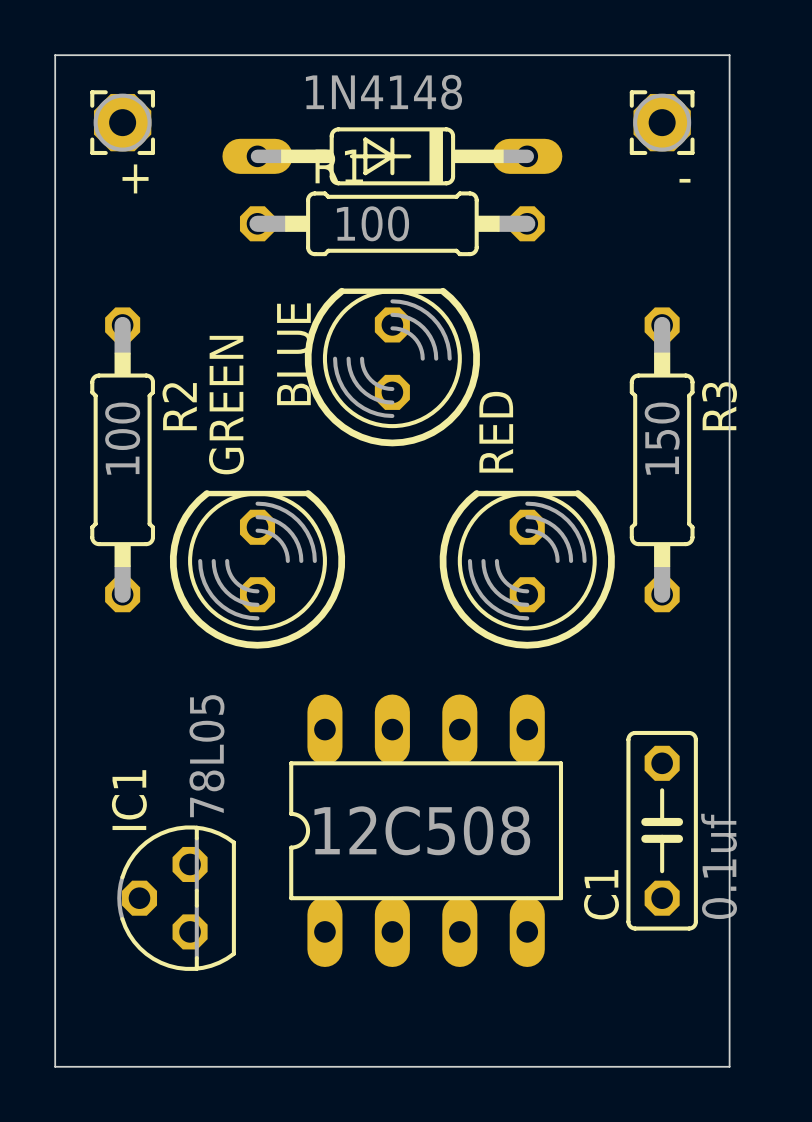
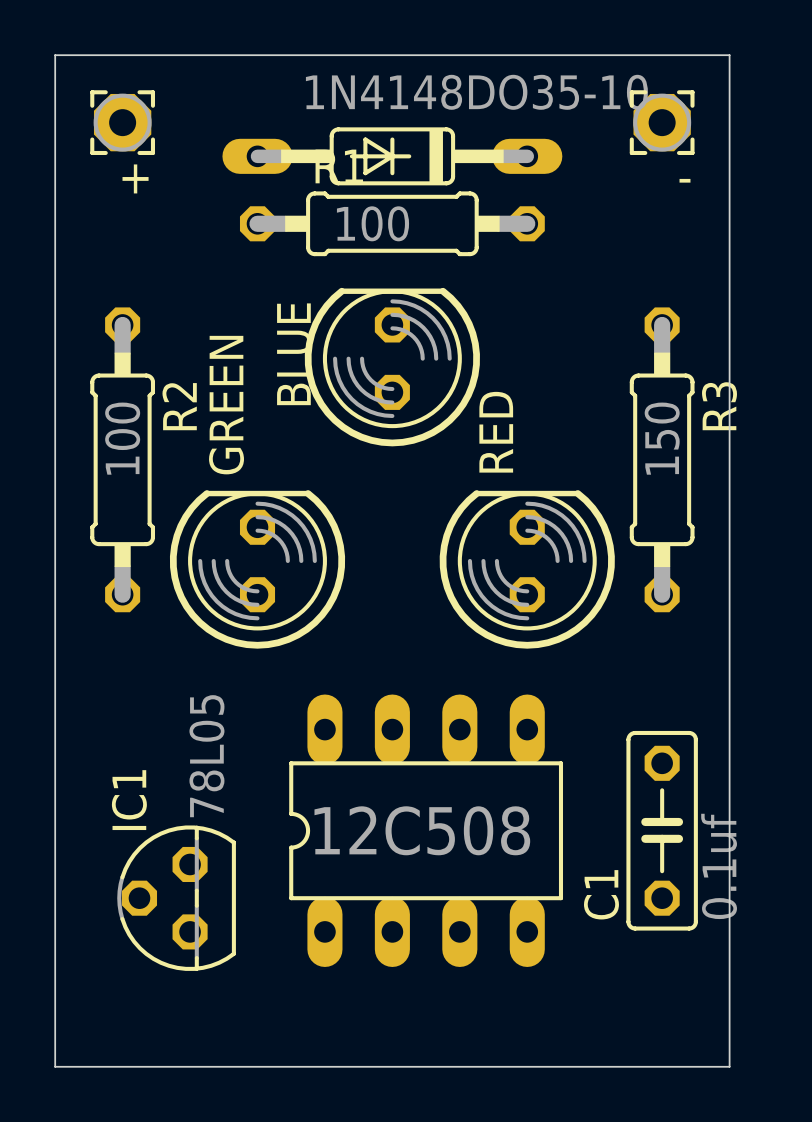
part value: 1N4148 (383, 92) -> 1N4148DO35-10 (476, 92)

